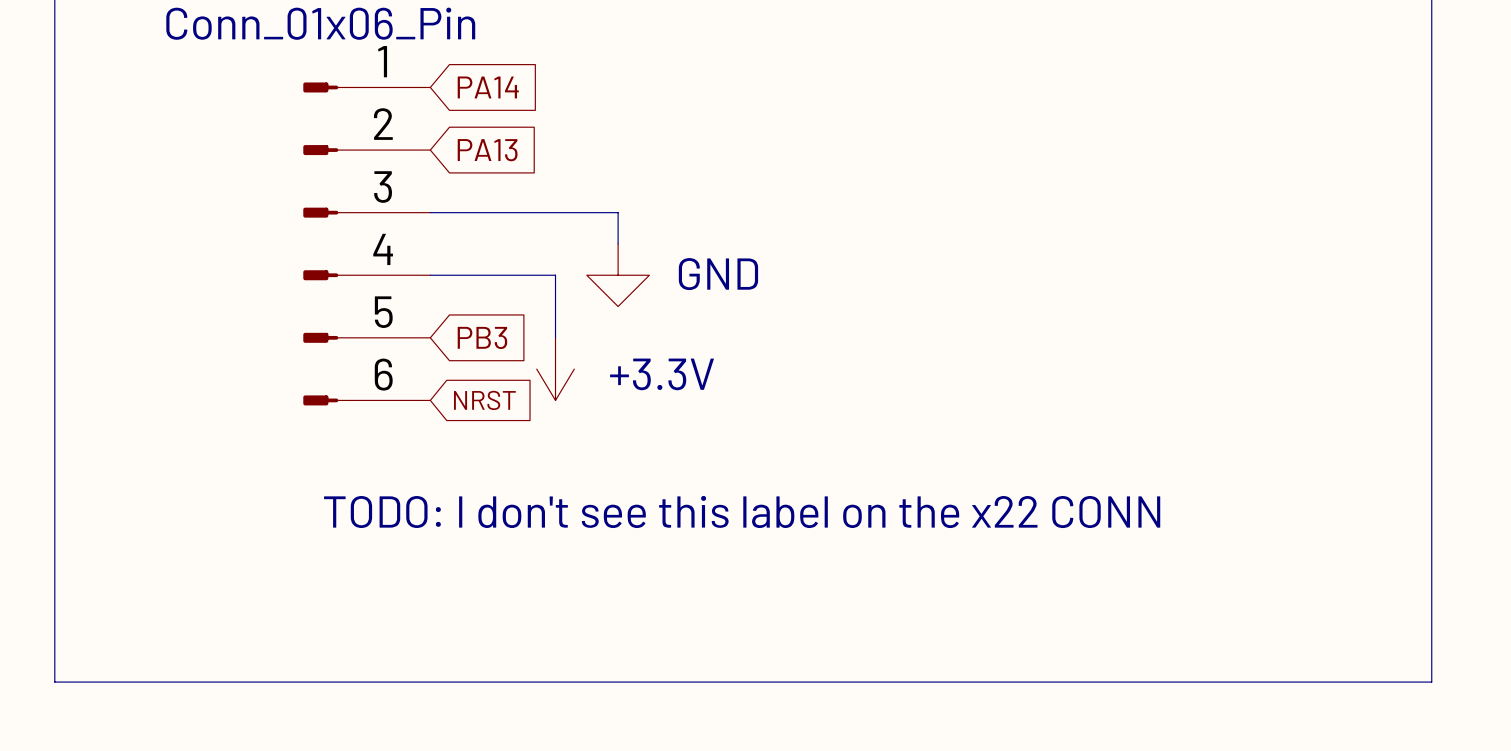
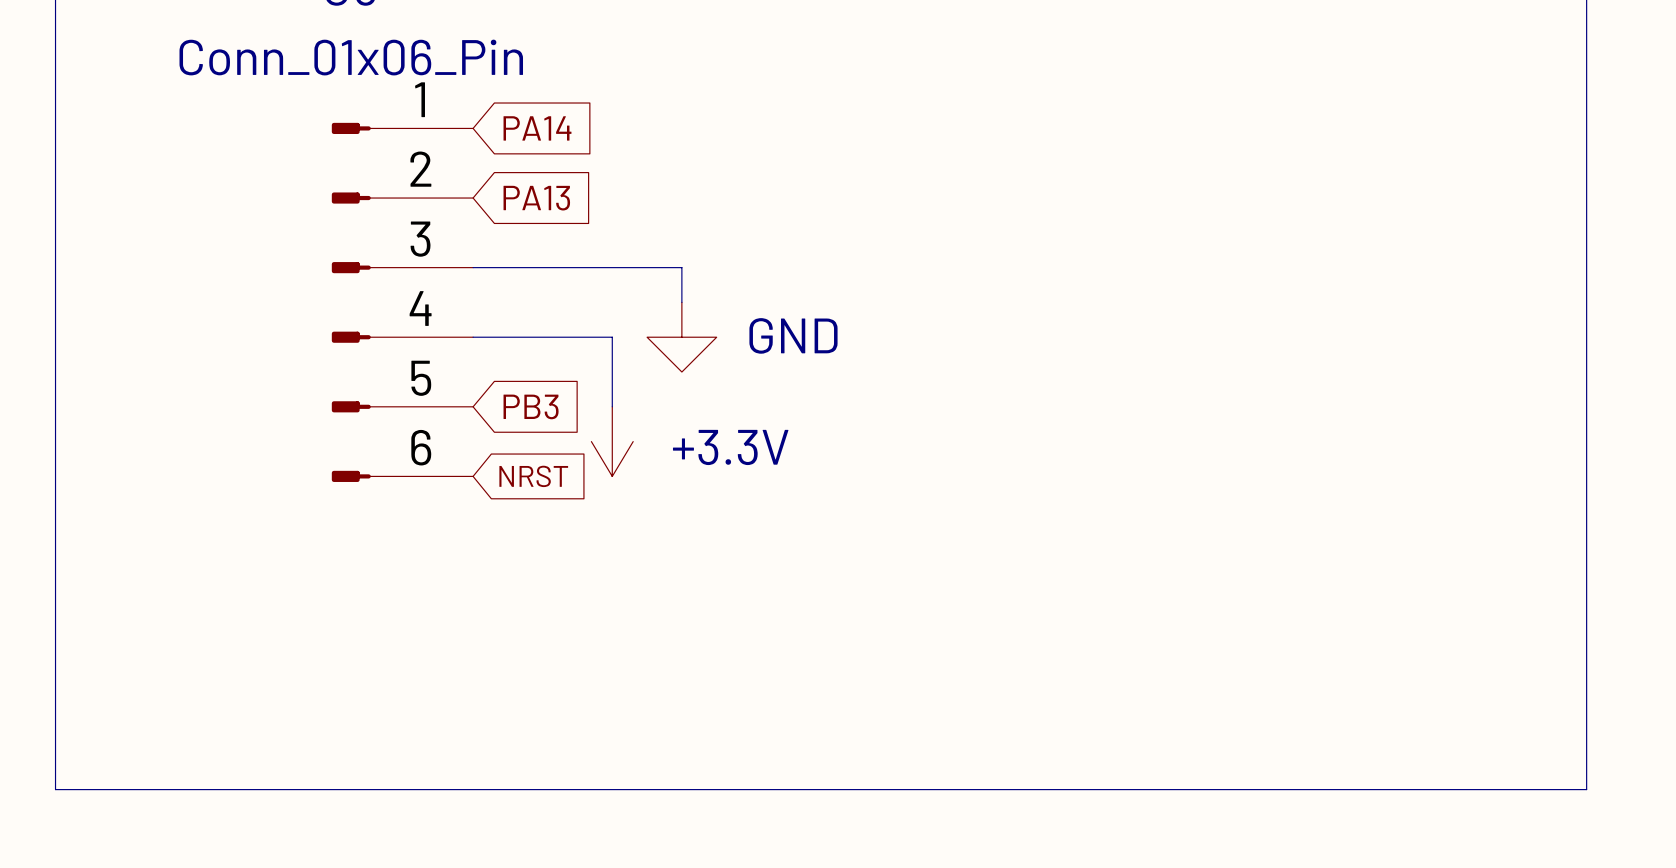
text: TODO: I don't see this label on the x22 CONN (742, 511) -> none

